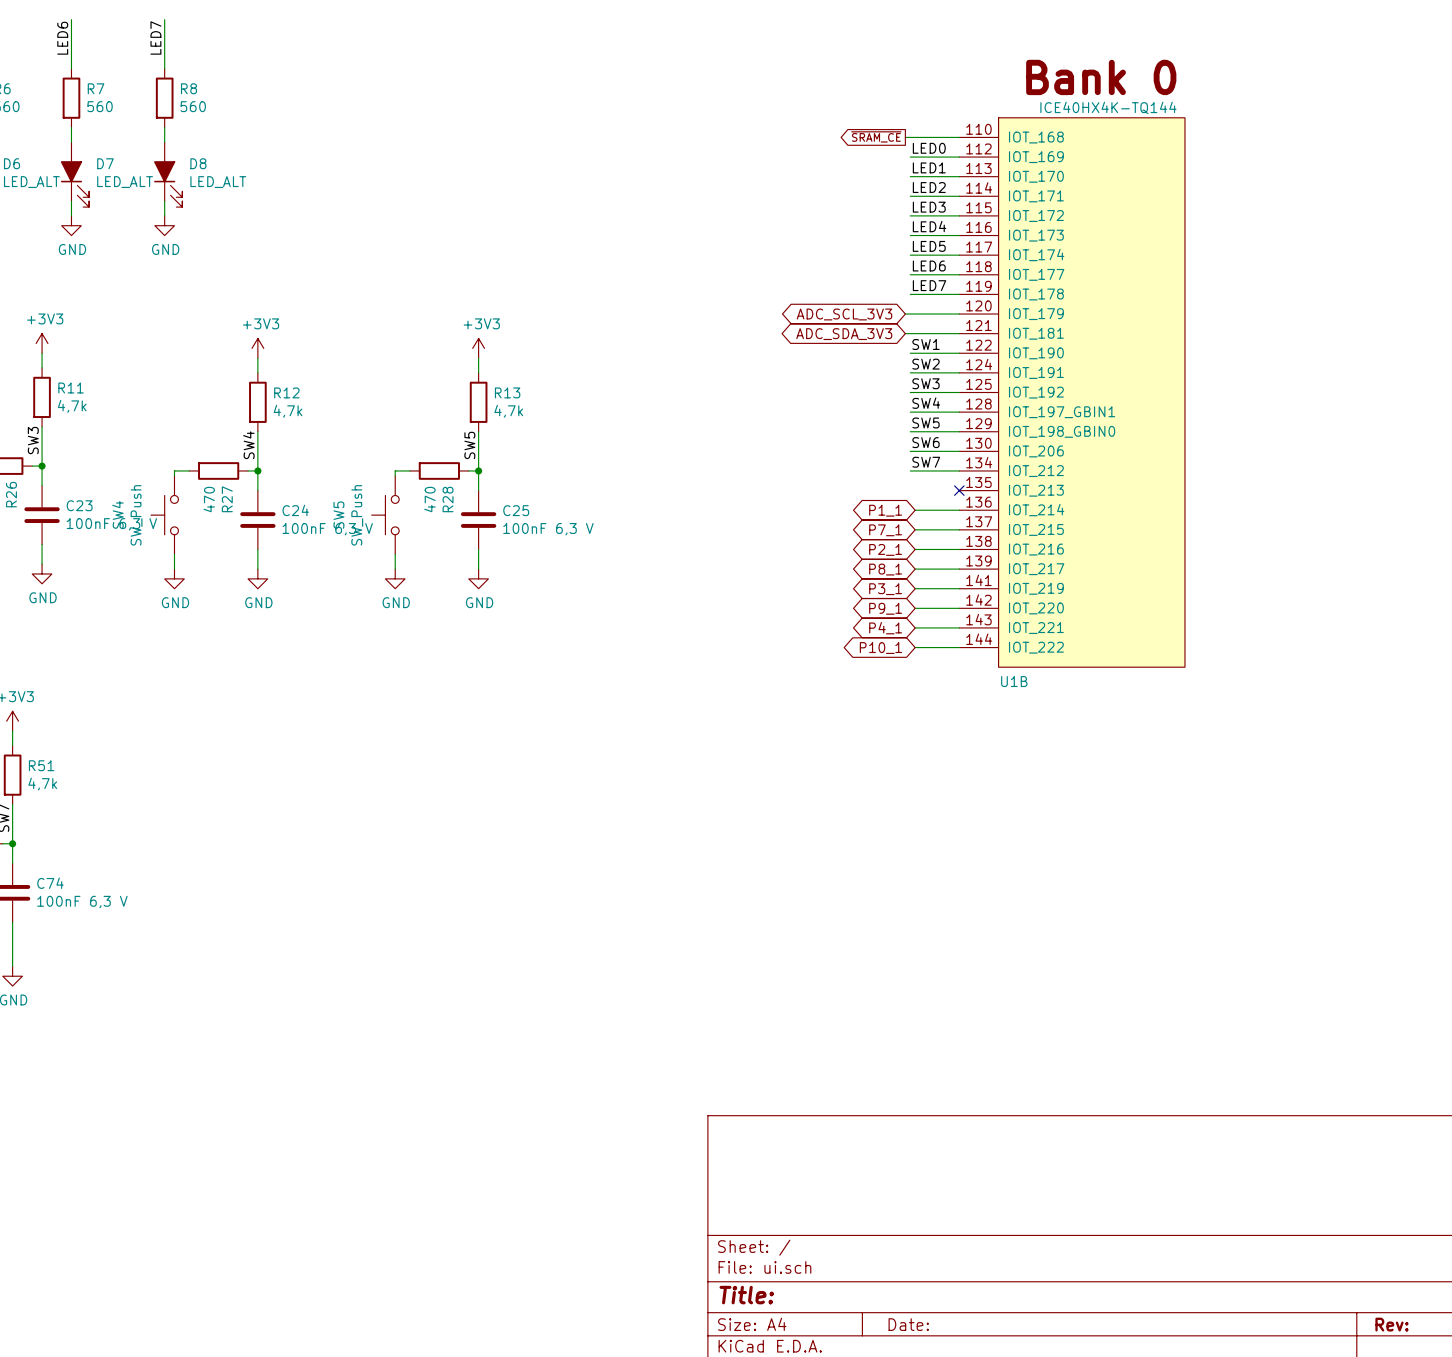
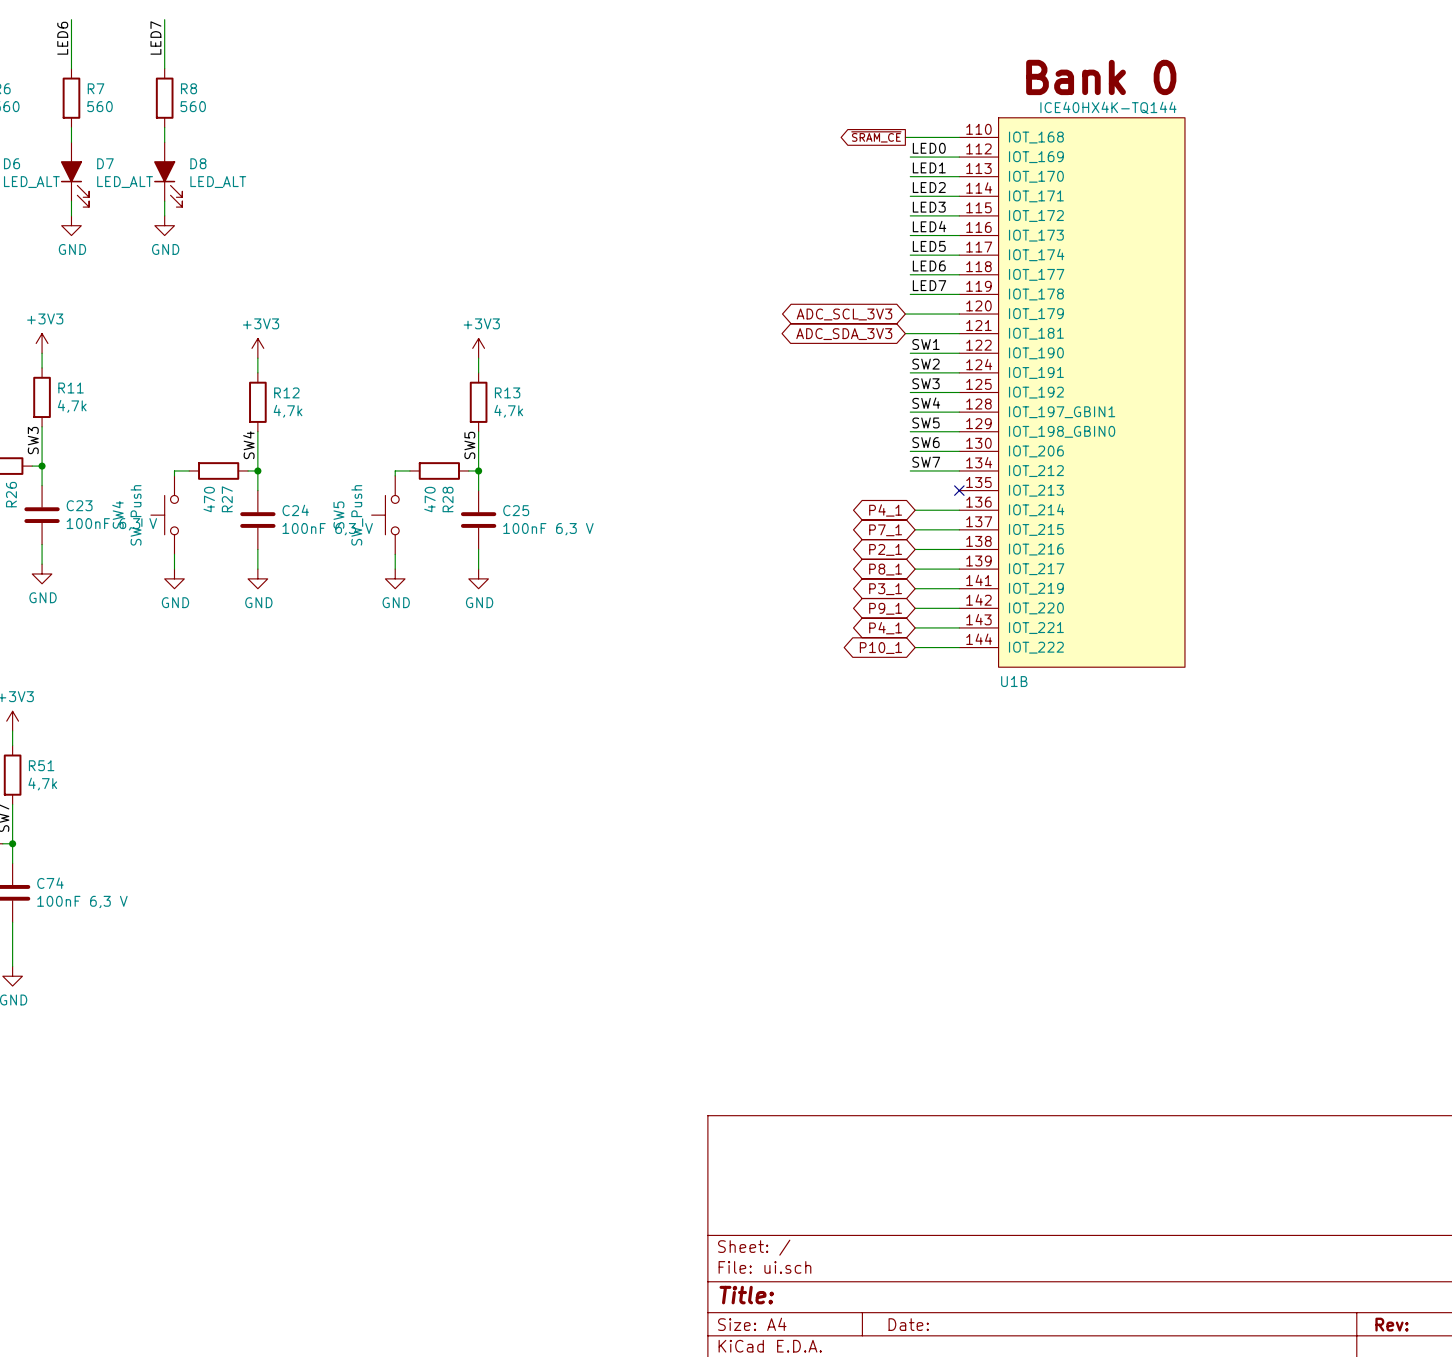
global label: P1_1 (885, 510) -> P4_1 (885, 510)

